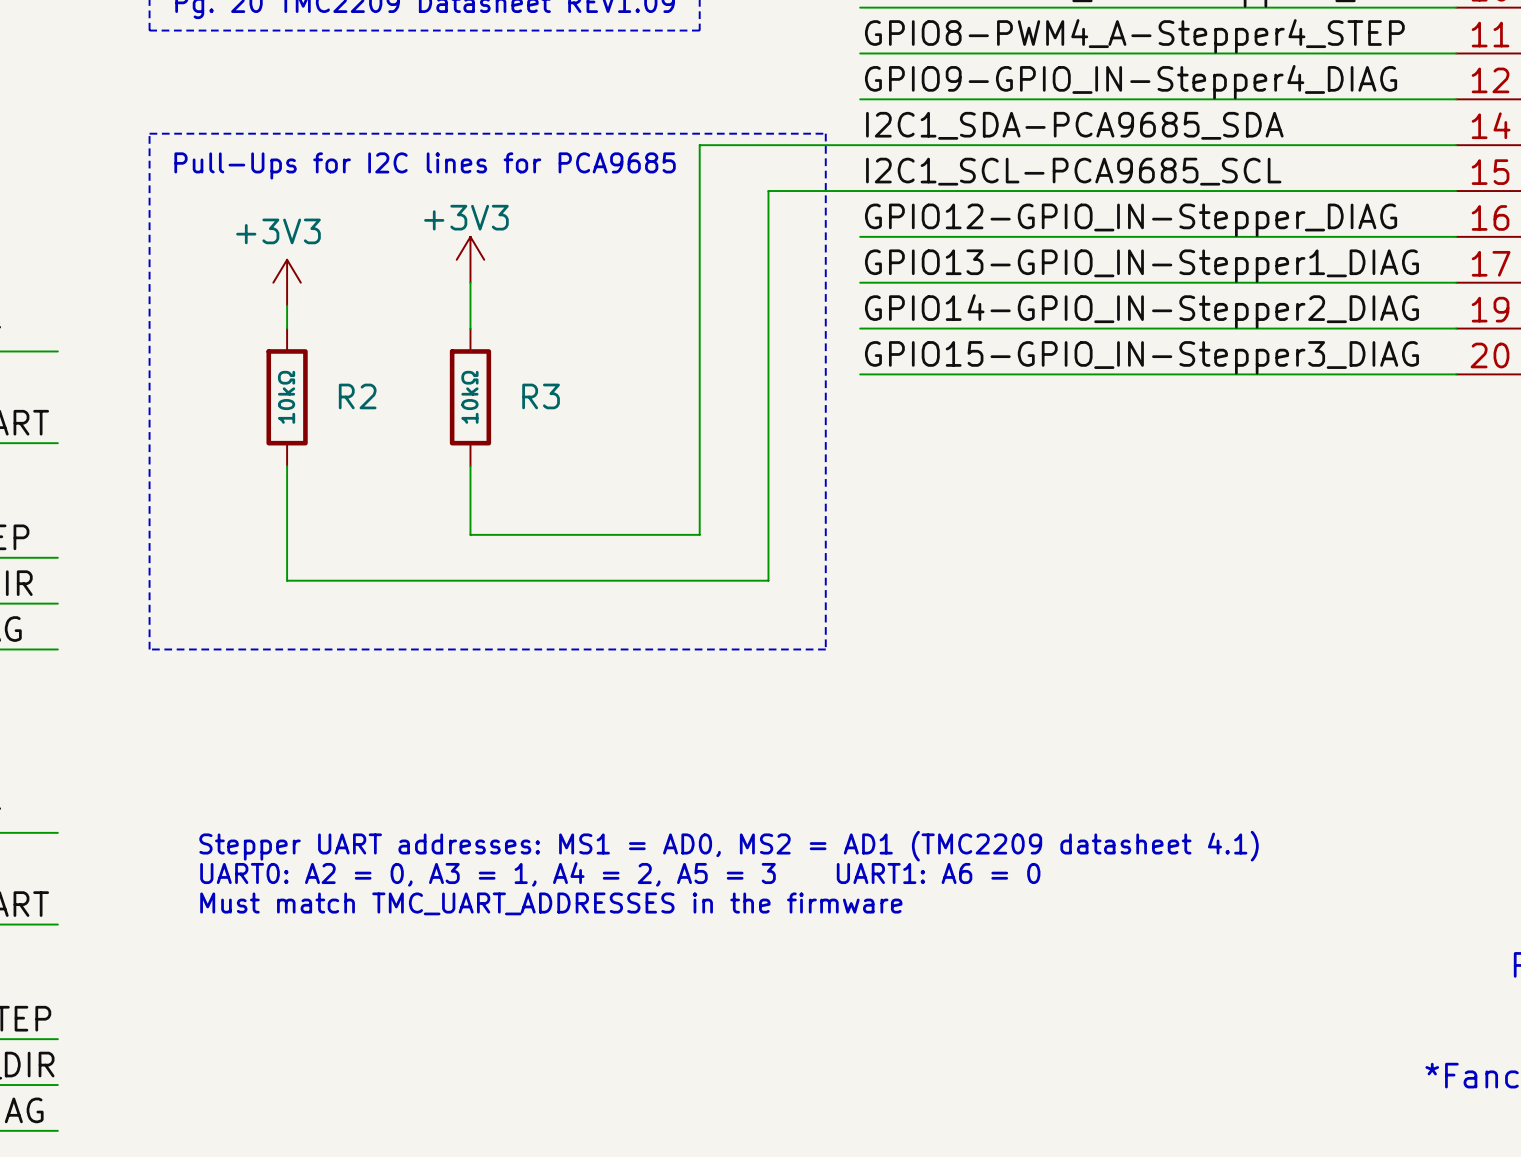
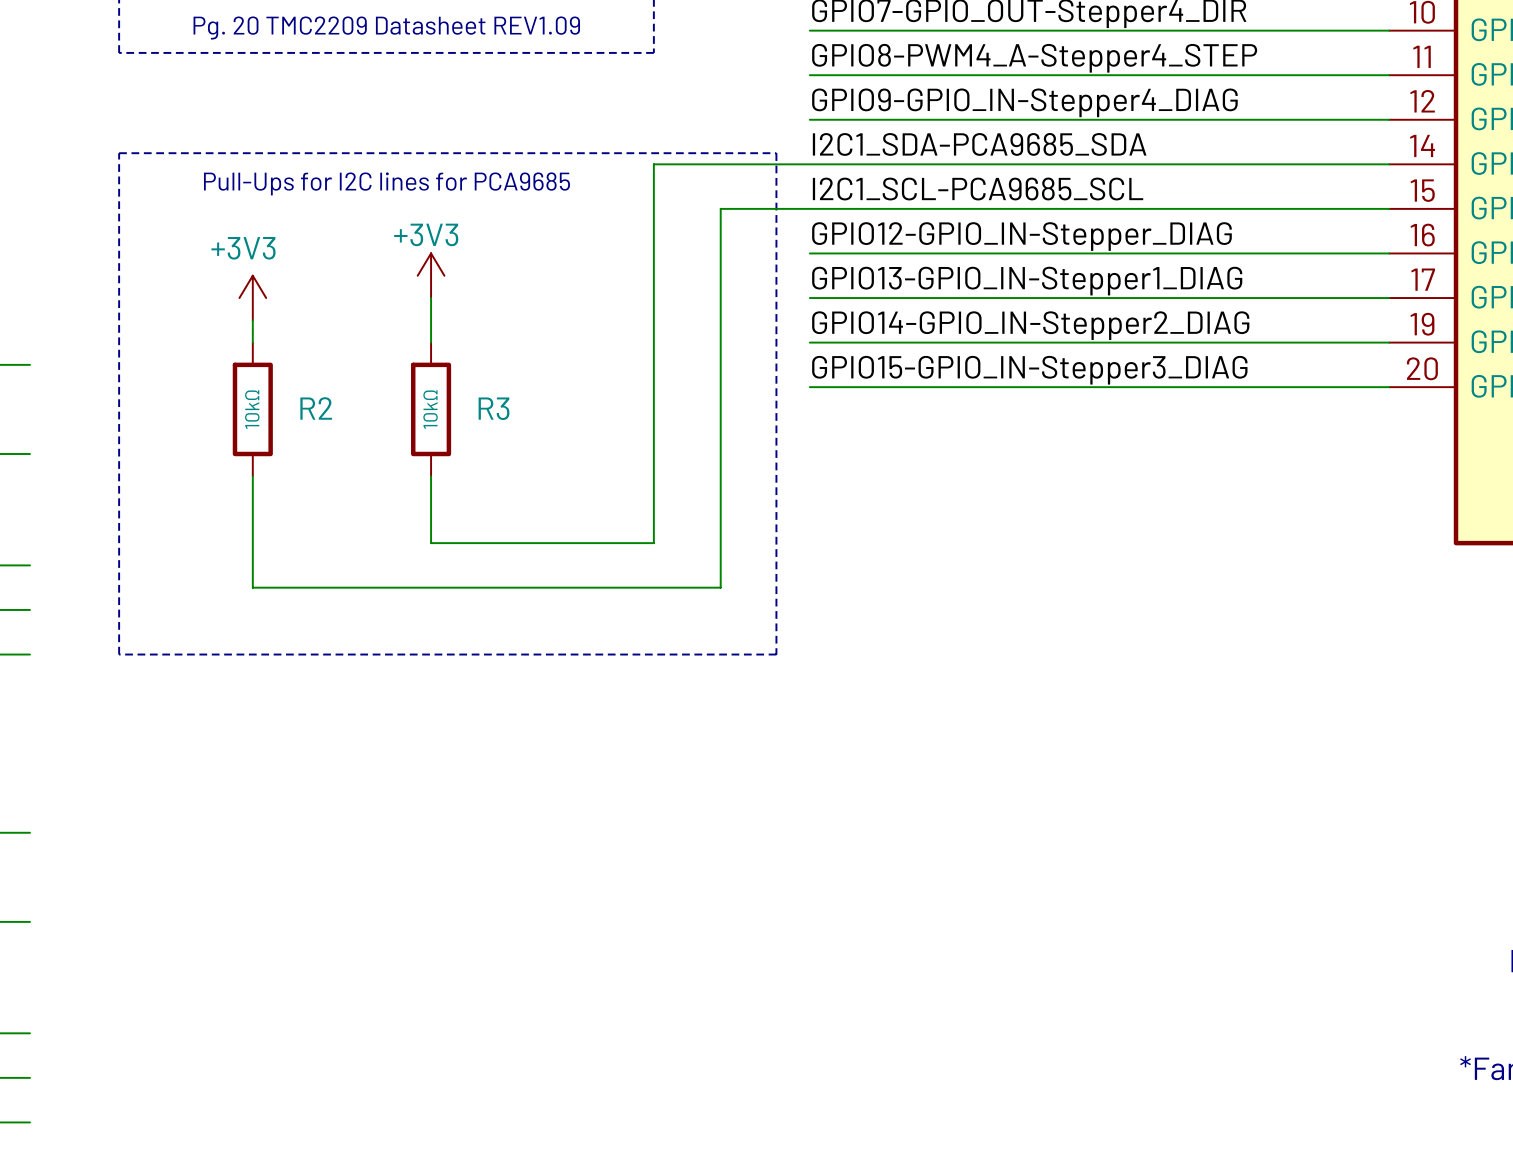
text: Stepper UART addresses: MS1 = AD0, MS2 = AD1 (TMC2209 datasheet 4.1) (729, 846) -> none
text: UART0: A2 = 0, A3 = 1, A4 = 2, A5 = 3 UART1: A6 = 0 (620, 874) -> none
text: Must match TMC_UART_ADDRESSES in the firmware (551, 903) -> none

